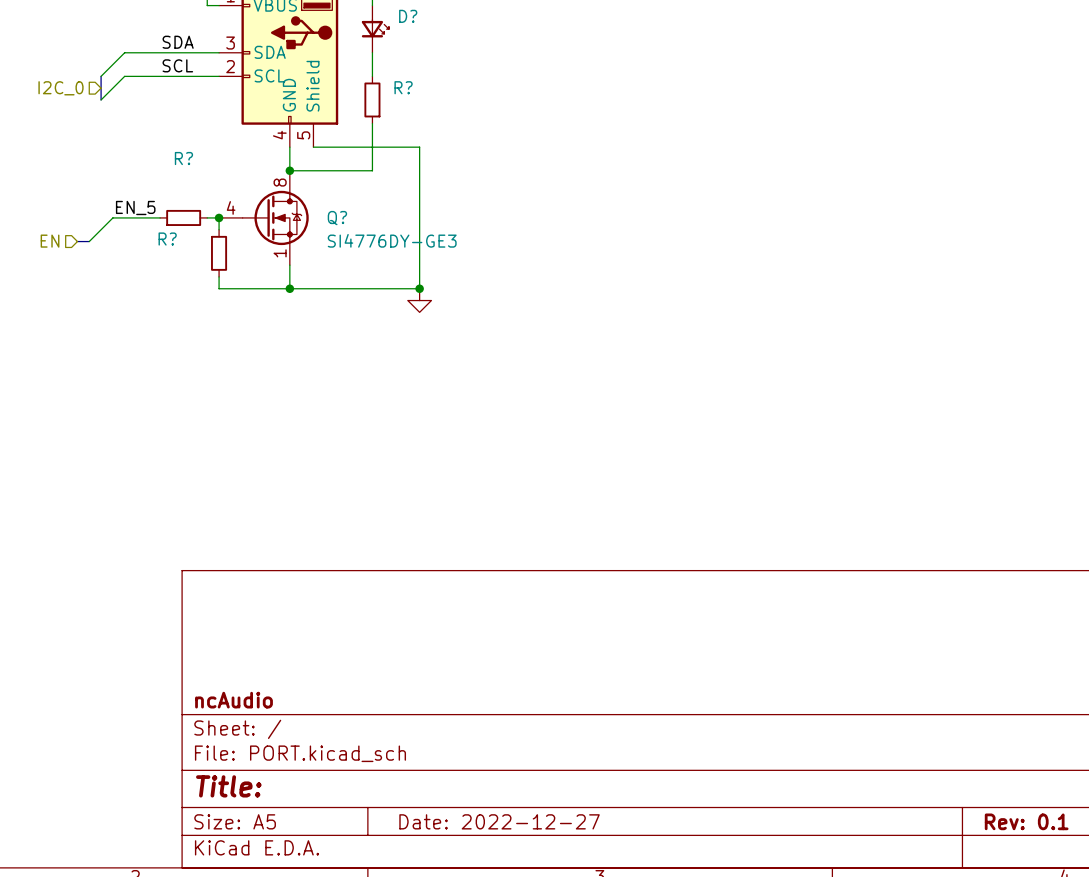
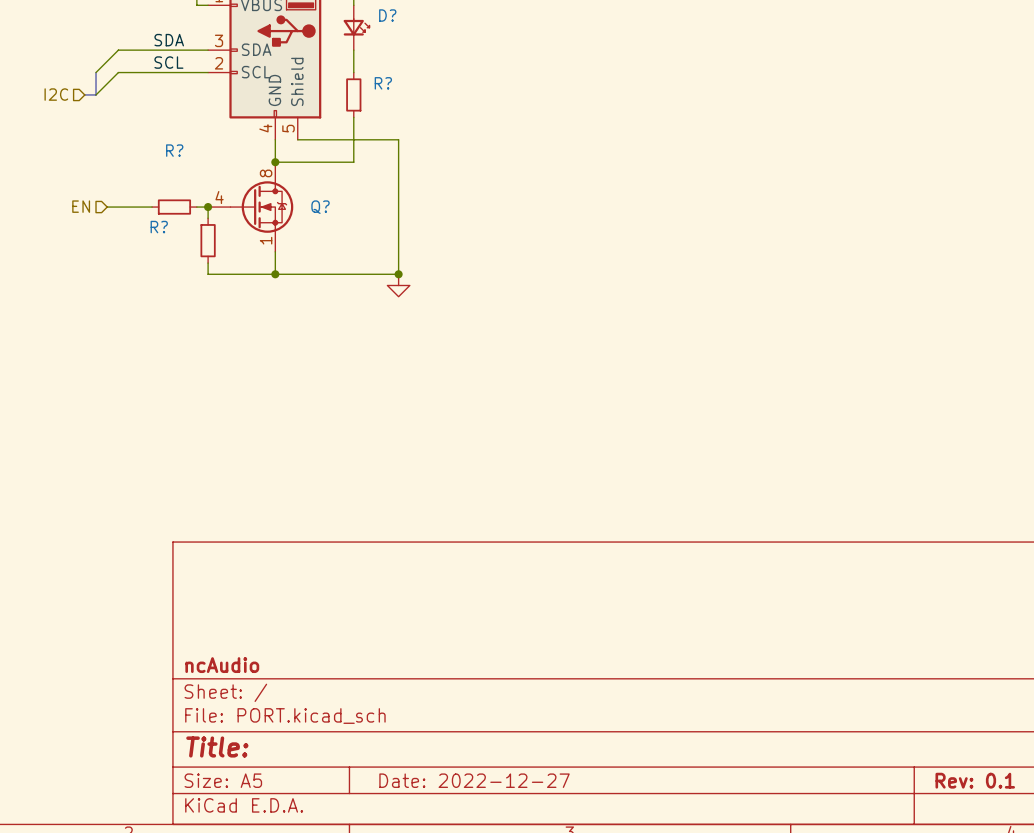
hierarchical label: I2C_0 (61, 88) -> I2C (56, 94)
label: EN_5 (135, 207) -> none
wire: (112, 217) (89, 241) -> none
Q? value: SI4776DY-GE3 (392, 240) -> none
hierarchical label position: EN (50, 241) -> EN (81, 206)
bus: (77, 241) (89, 241) -> (84, 94) (96, 94)

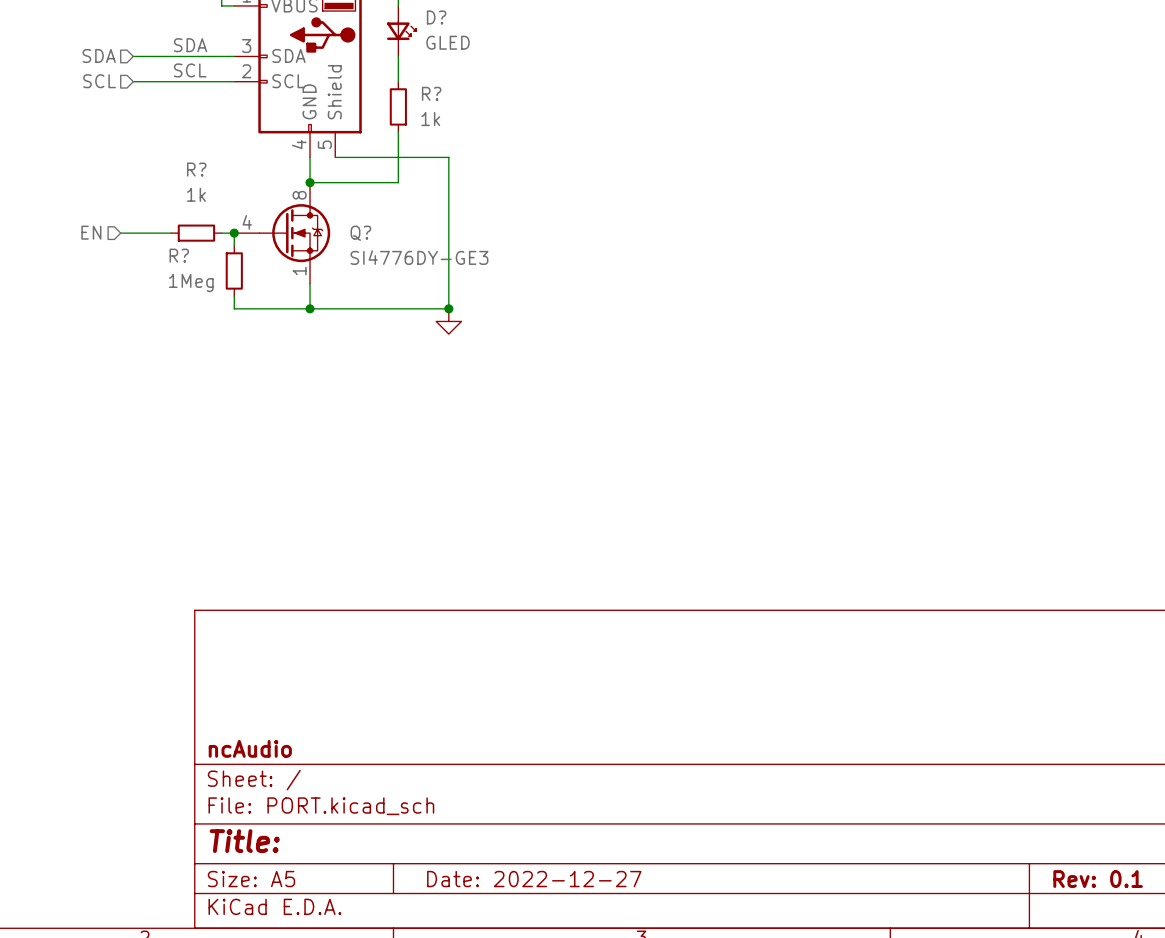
D? value: none -> GLED (448, 42)
hierarchical label: none -> SDA (99, 55)
wire: (118, 50) (96, 72) -> none
hierarchical label: none -> SCL (99, 81)
bus: (96, 72) (96, 94) (84, 94) -> none
wire: (118, 72) (96, 94) -> none
hierarchical label: I2C (56, 94) -> none
R? value: none -> 1k (430, 119)
R? value: none -> 1k (196, 194)
Q? value: none -> SI4776DY-GE3 (419, 257)
R? value: none -> 1Meg (191, 283)

